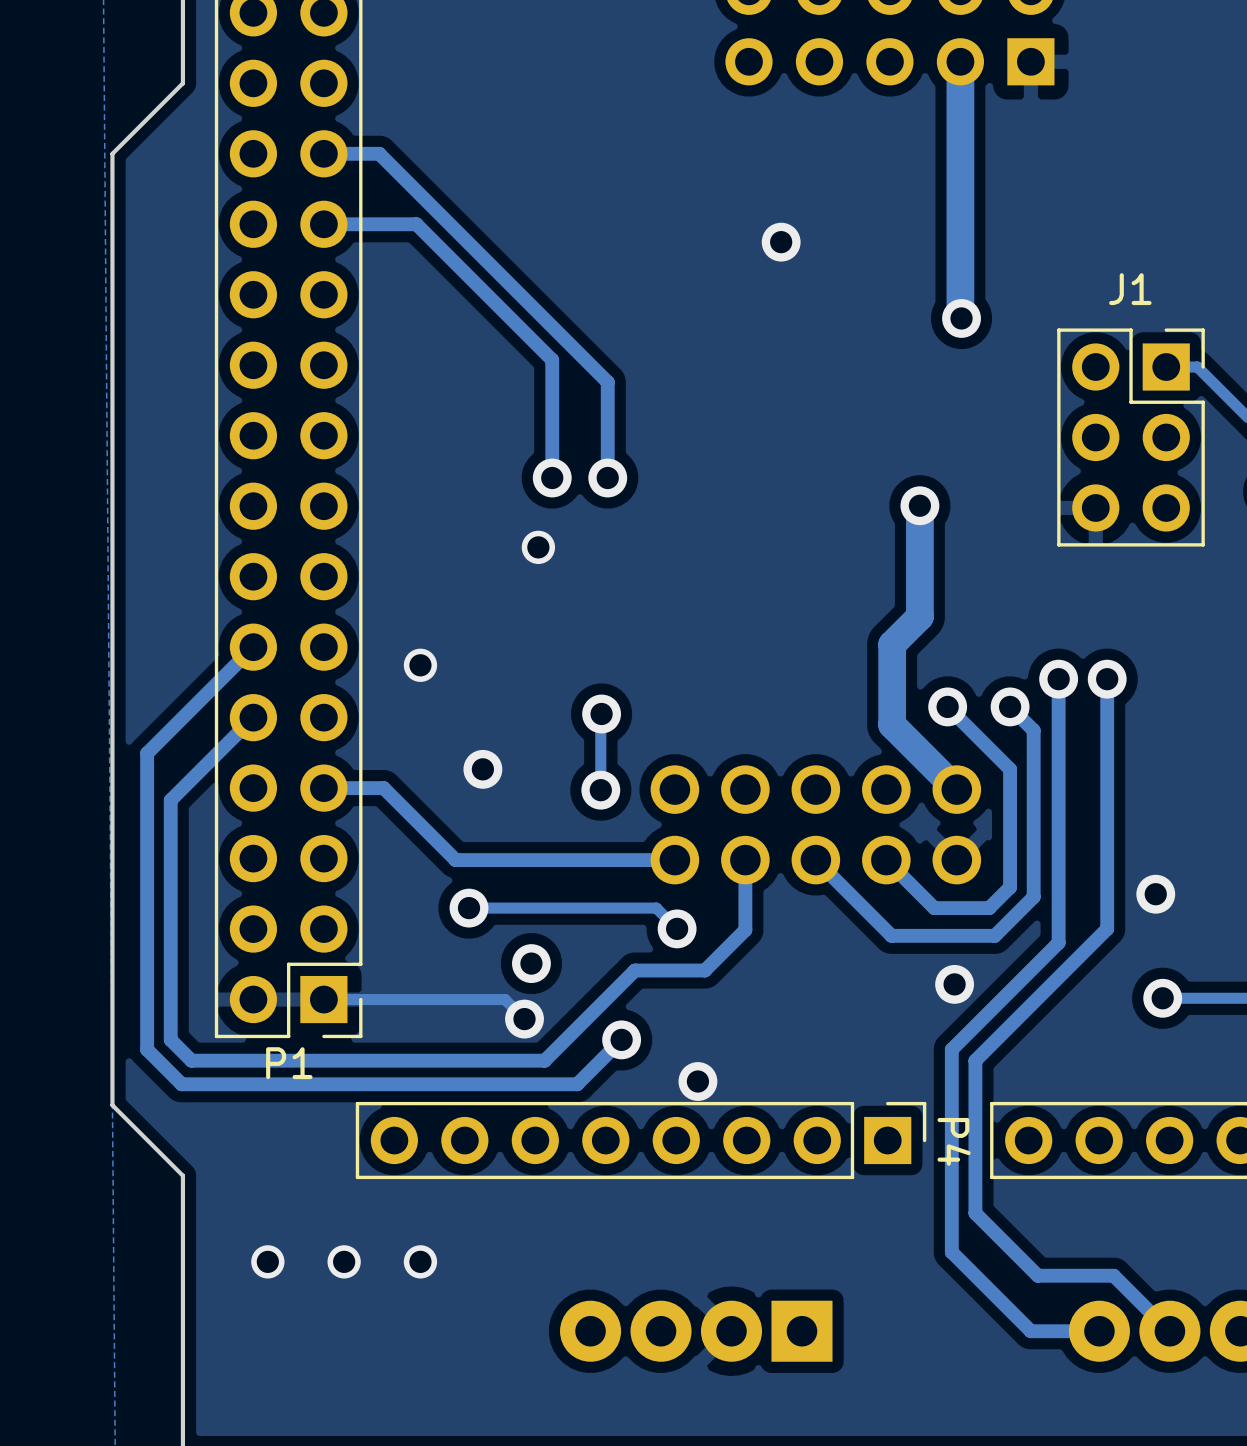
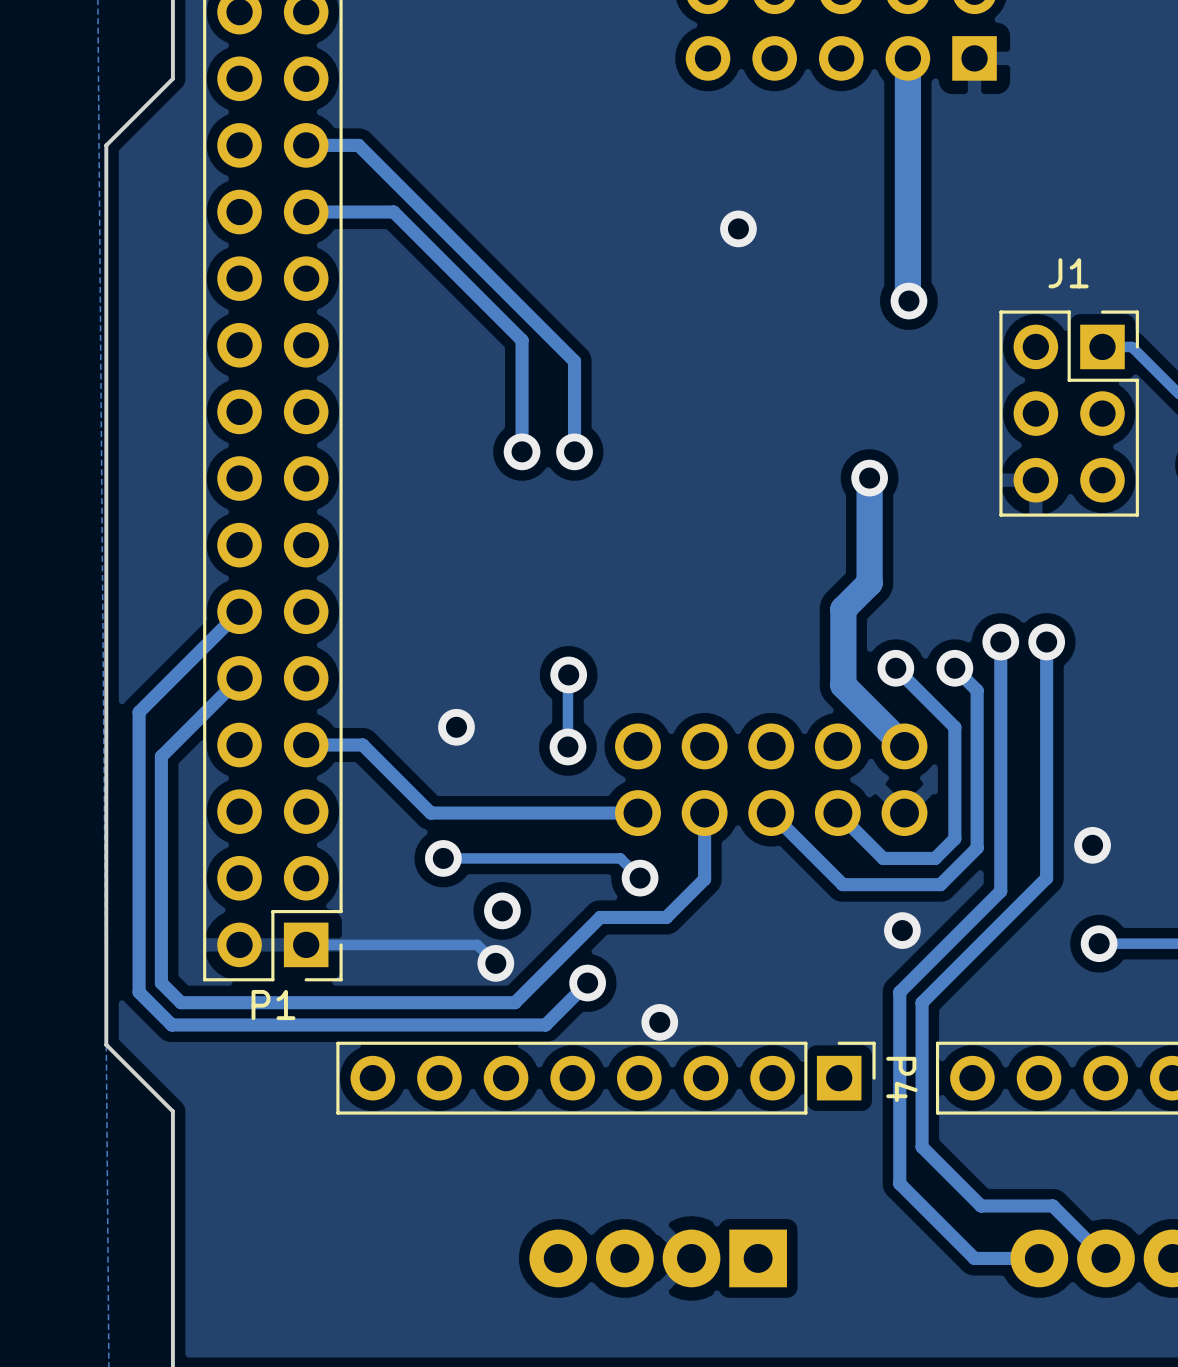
via: (538, 547) -> none
via: (420, 665) -> none
via: (267, 1261) -> none
via: (344, 1261) -> none
via: (420, 1261) -> none

